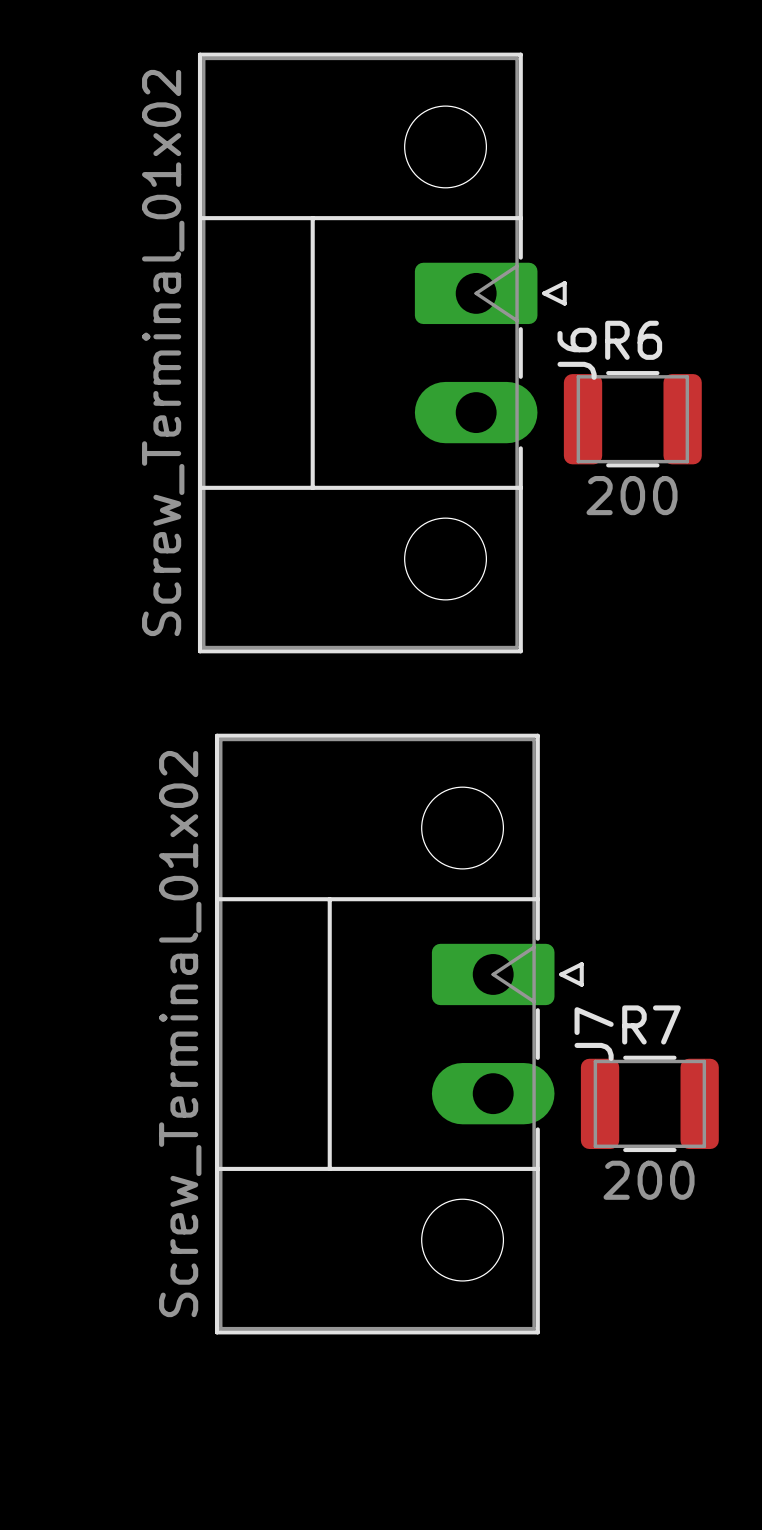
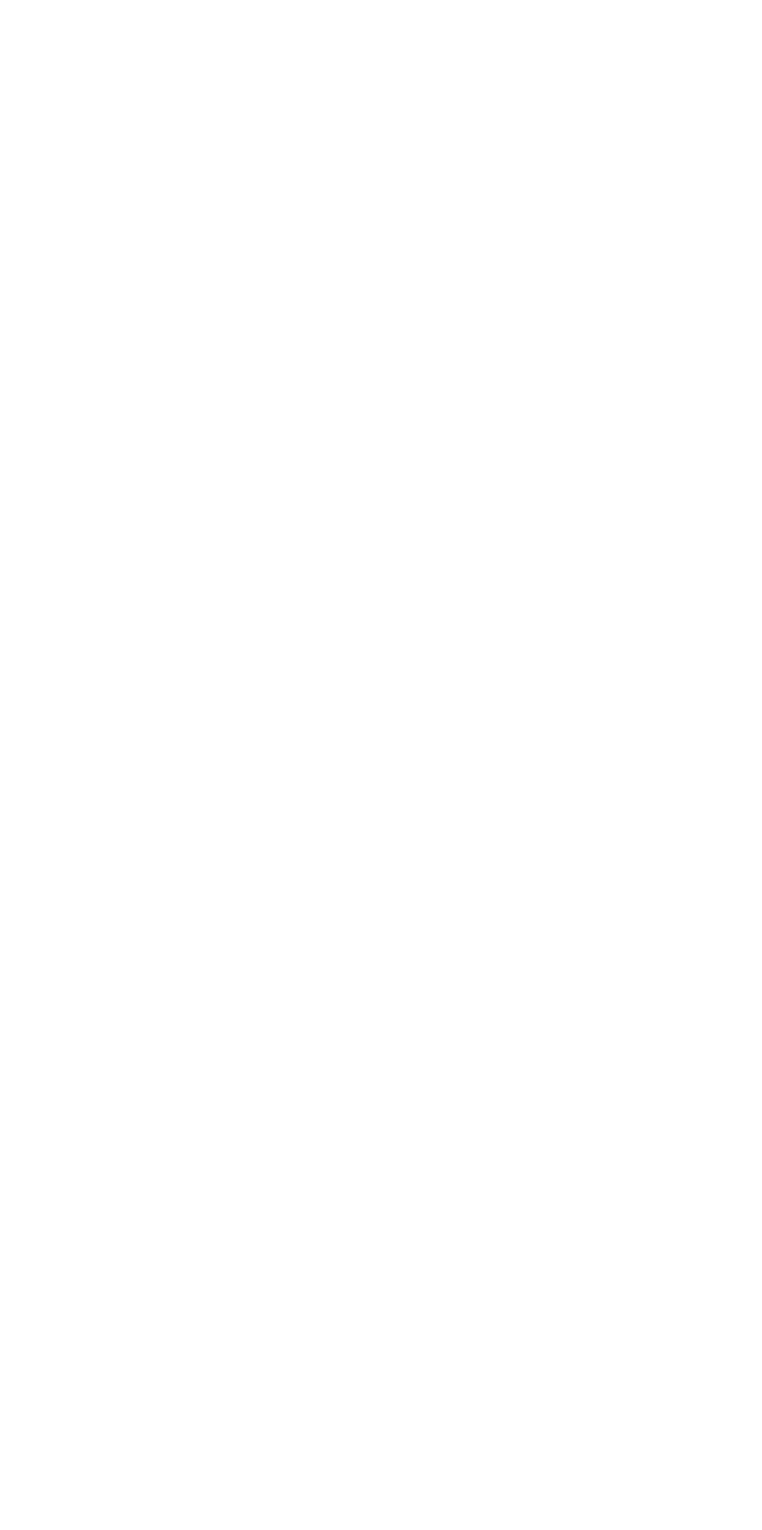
J6: Screw_Terminal_01x02 (382, 352) -> none
R6: 200 (632, 419) -> none
J7: Screw_Terminal_01x02 (399, 1034) -> none
R7: 200 (649, 1103) -> none

